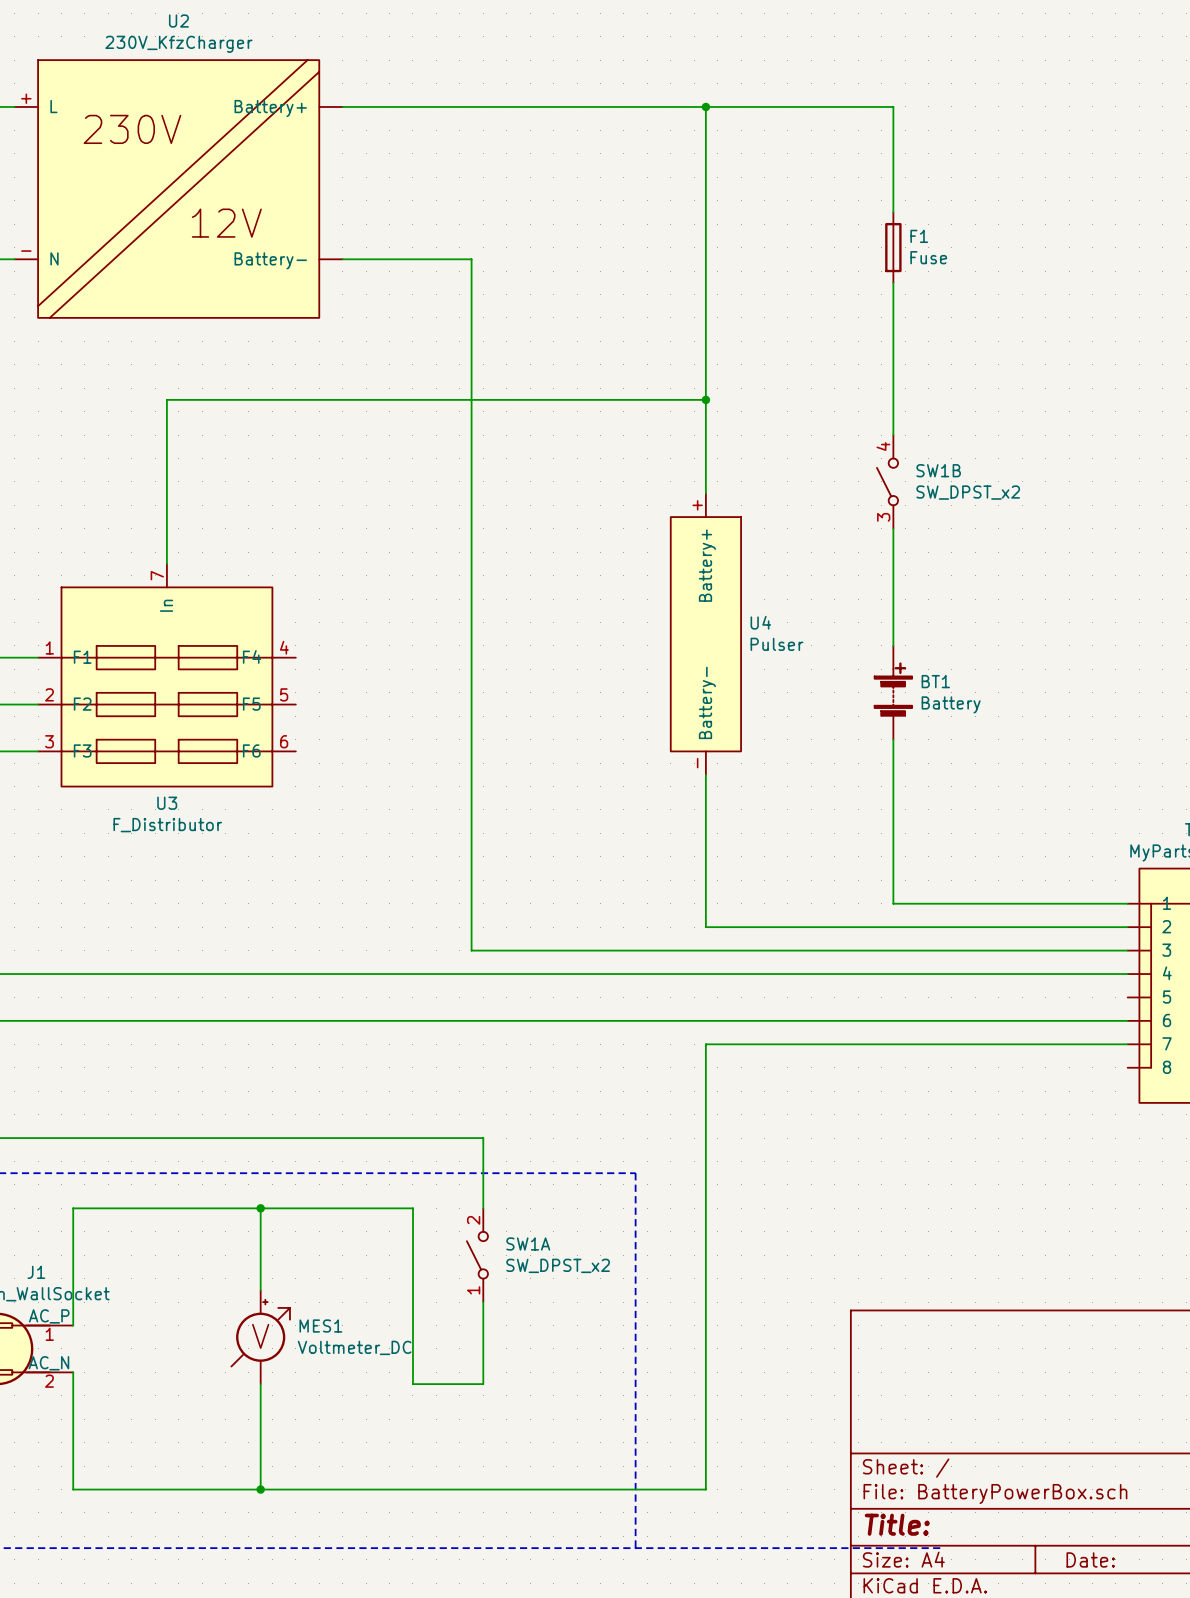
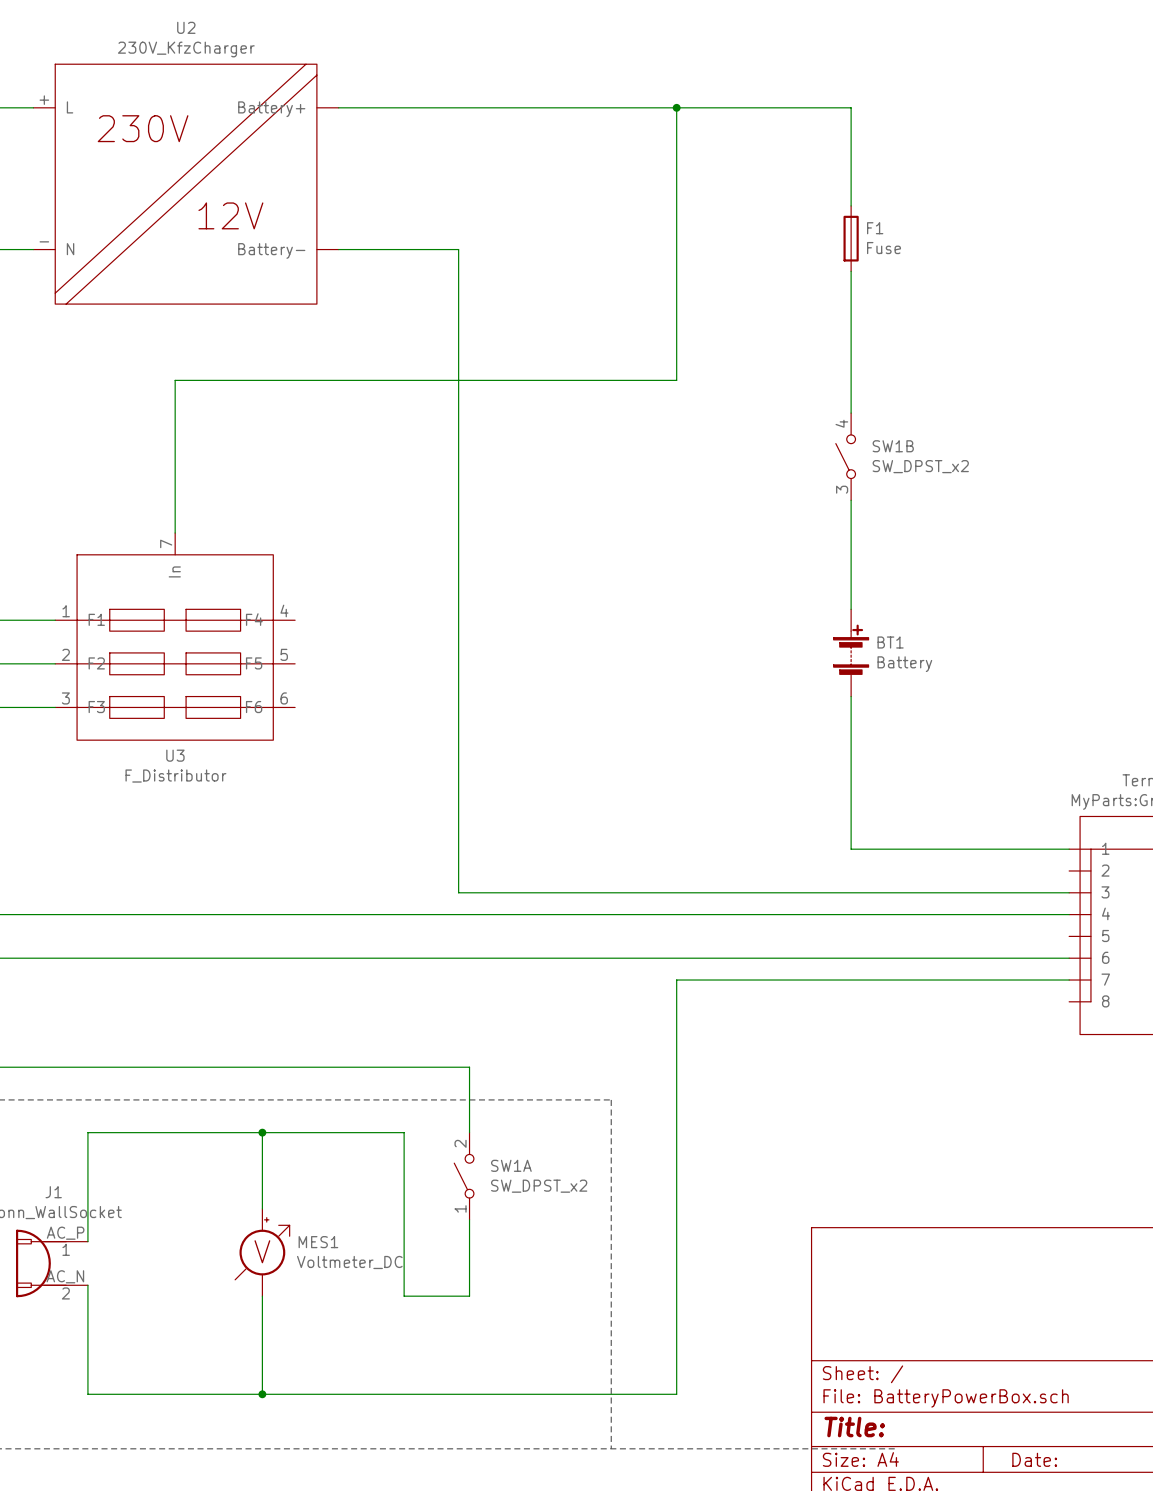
wire: (705, 399) (705, 493) -> none
junction: (705, 399) -> none
U4: Pulser (705, 634) -> none
wire: (705, 774) (705, 927) (1127, 927) -> none

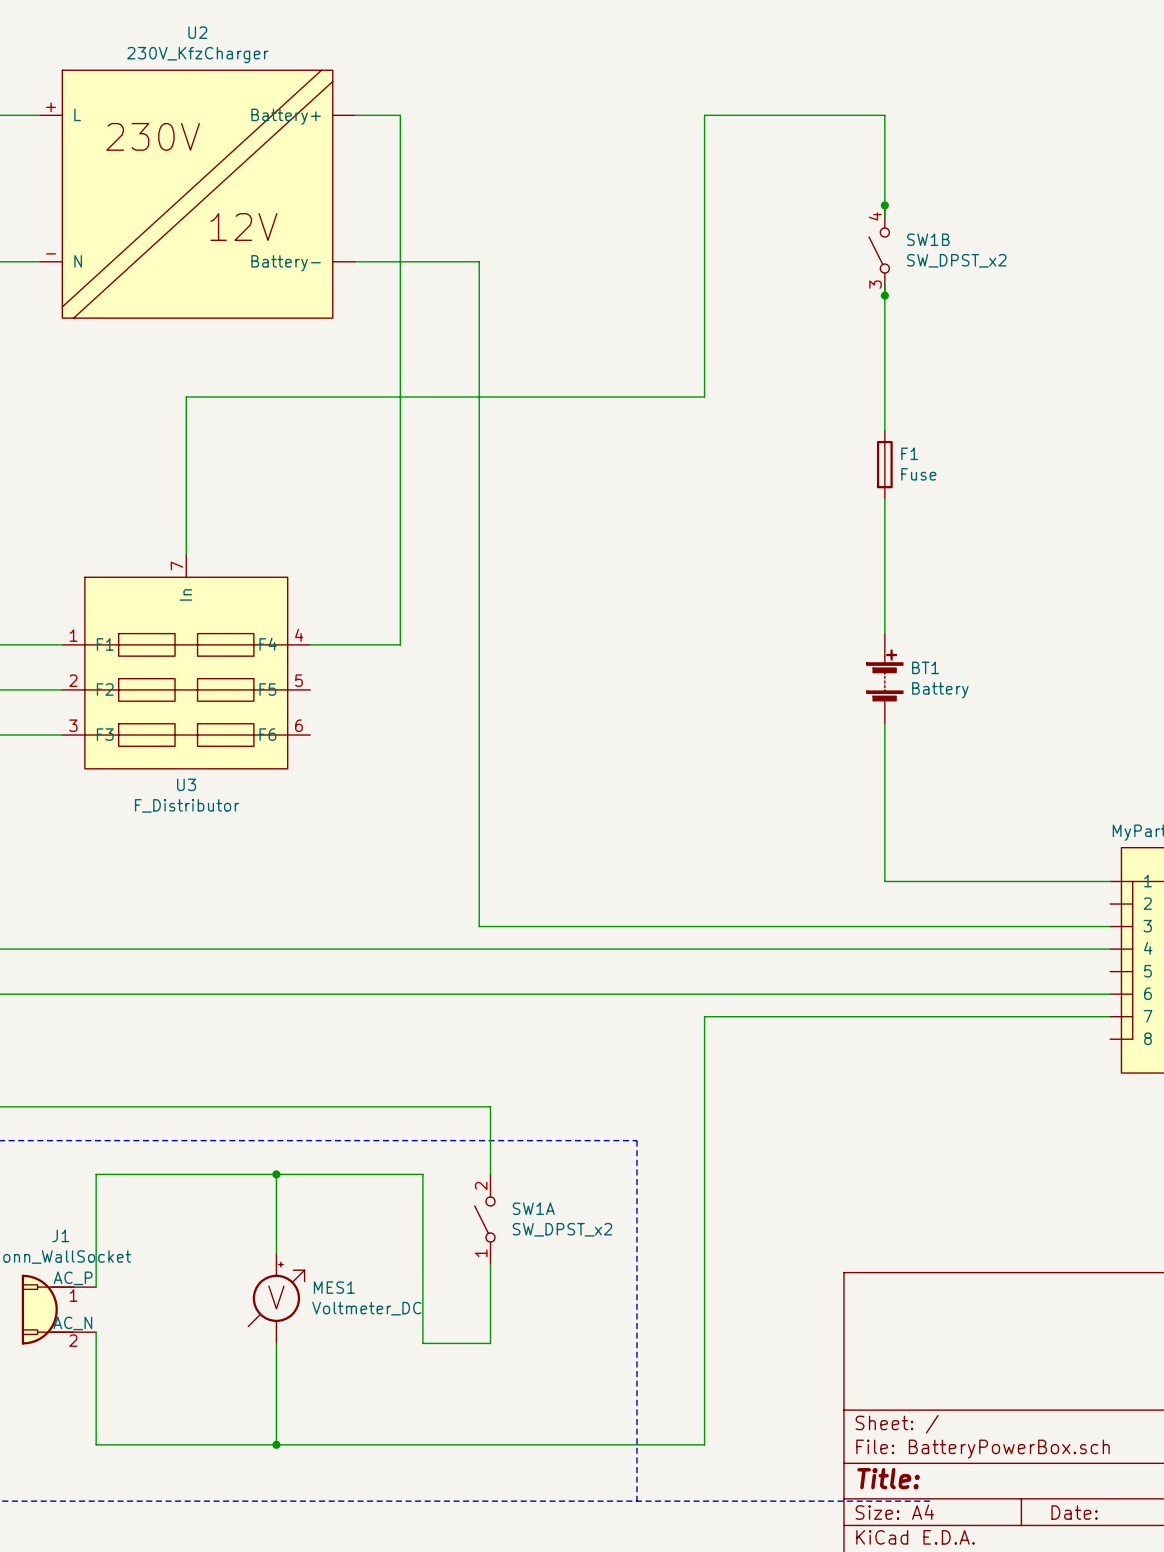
wire: (382, 107) (676, 107) -> (400, 115) (400, 644) (310, 644)
junction: (676, 107) -> none
junction: none -> (884, 205)
F1 position: (851, 238) -> (884, 464)
junction: none -> (884, 295)
SW1B position: (845, 456) -> (879, 250)

